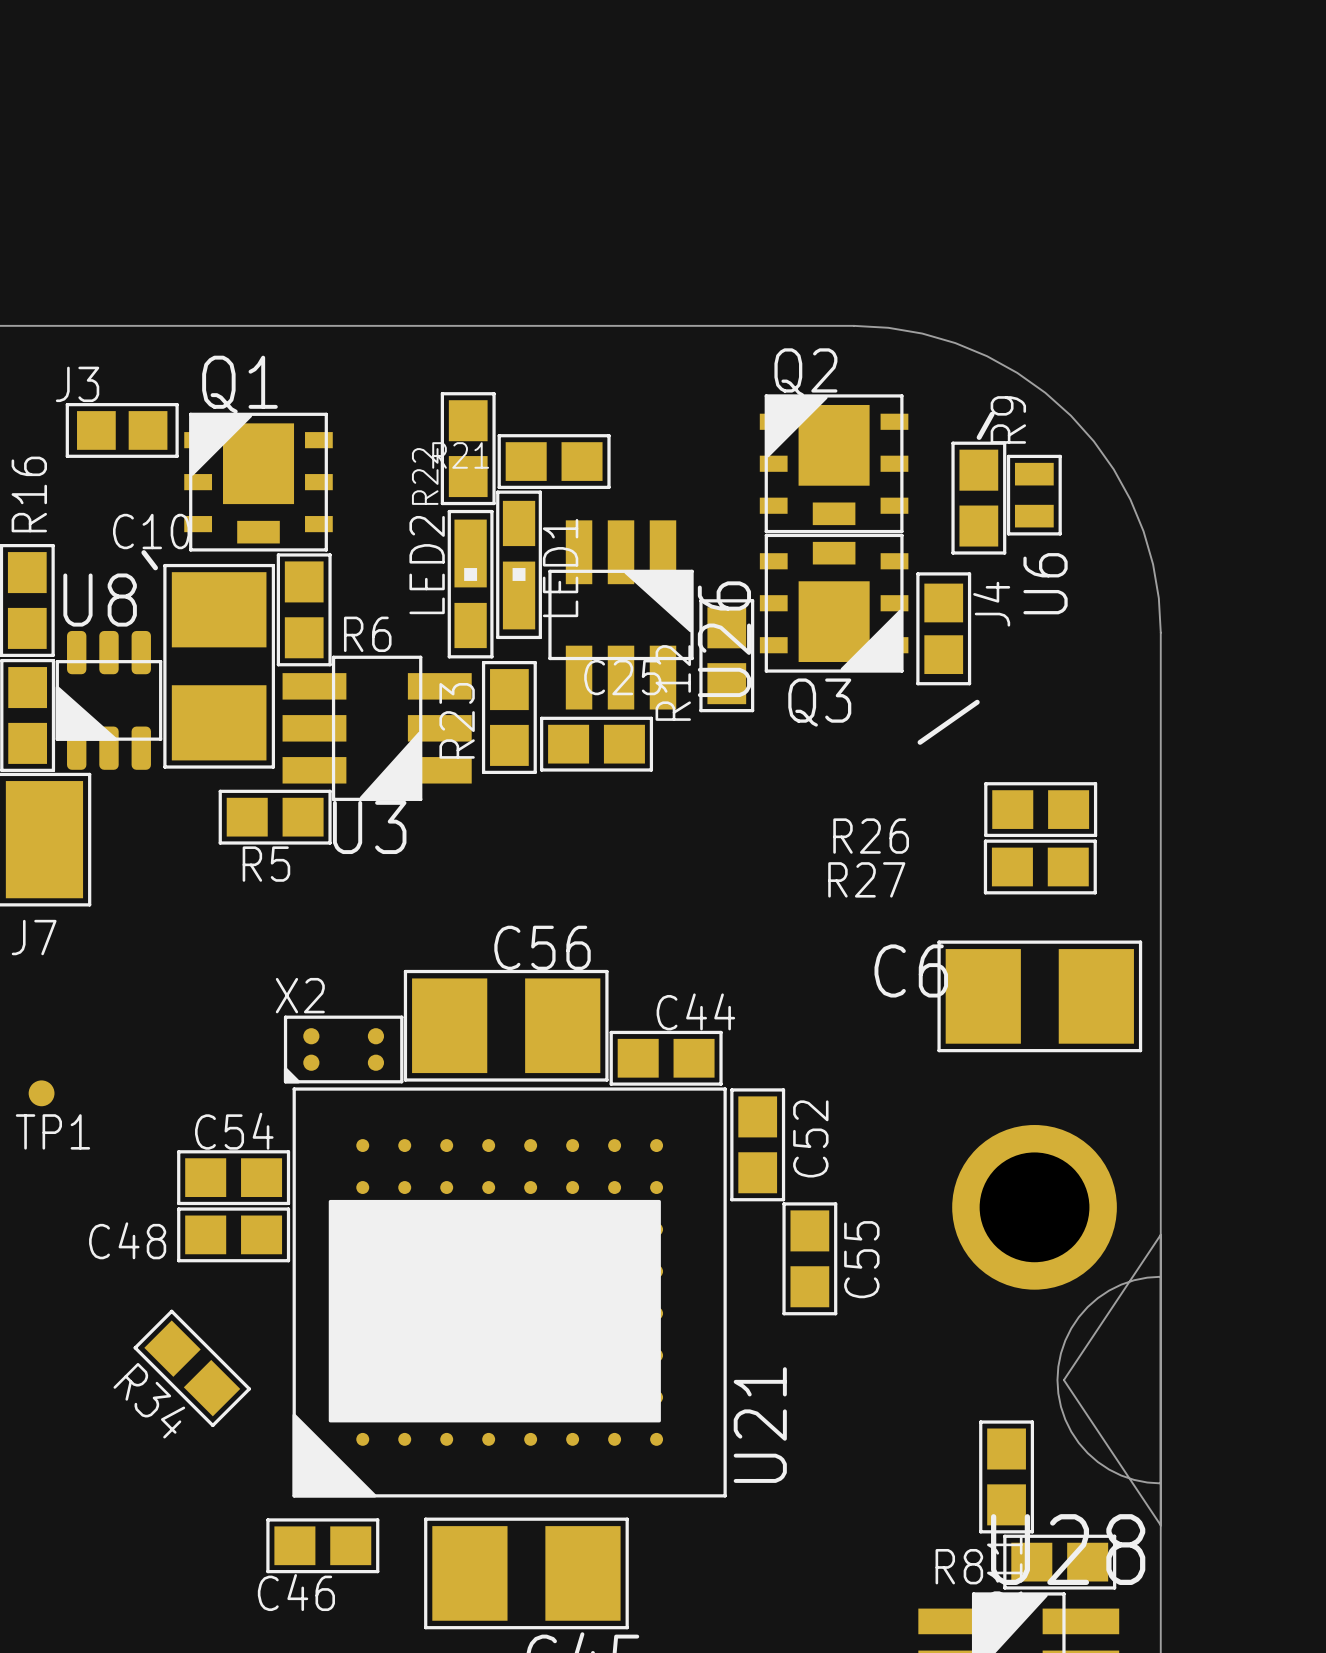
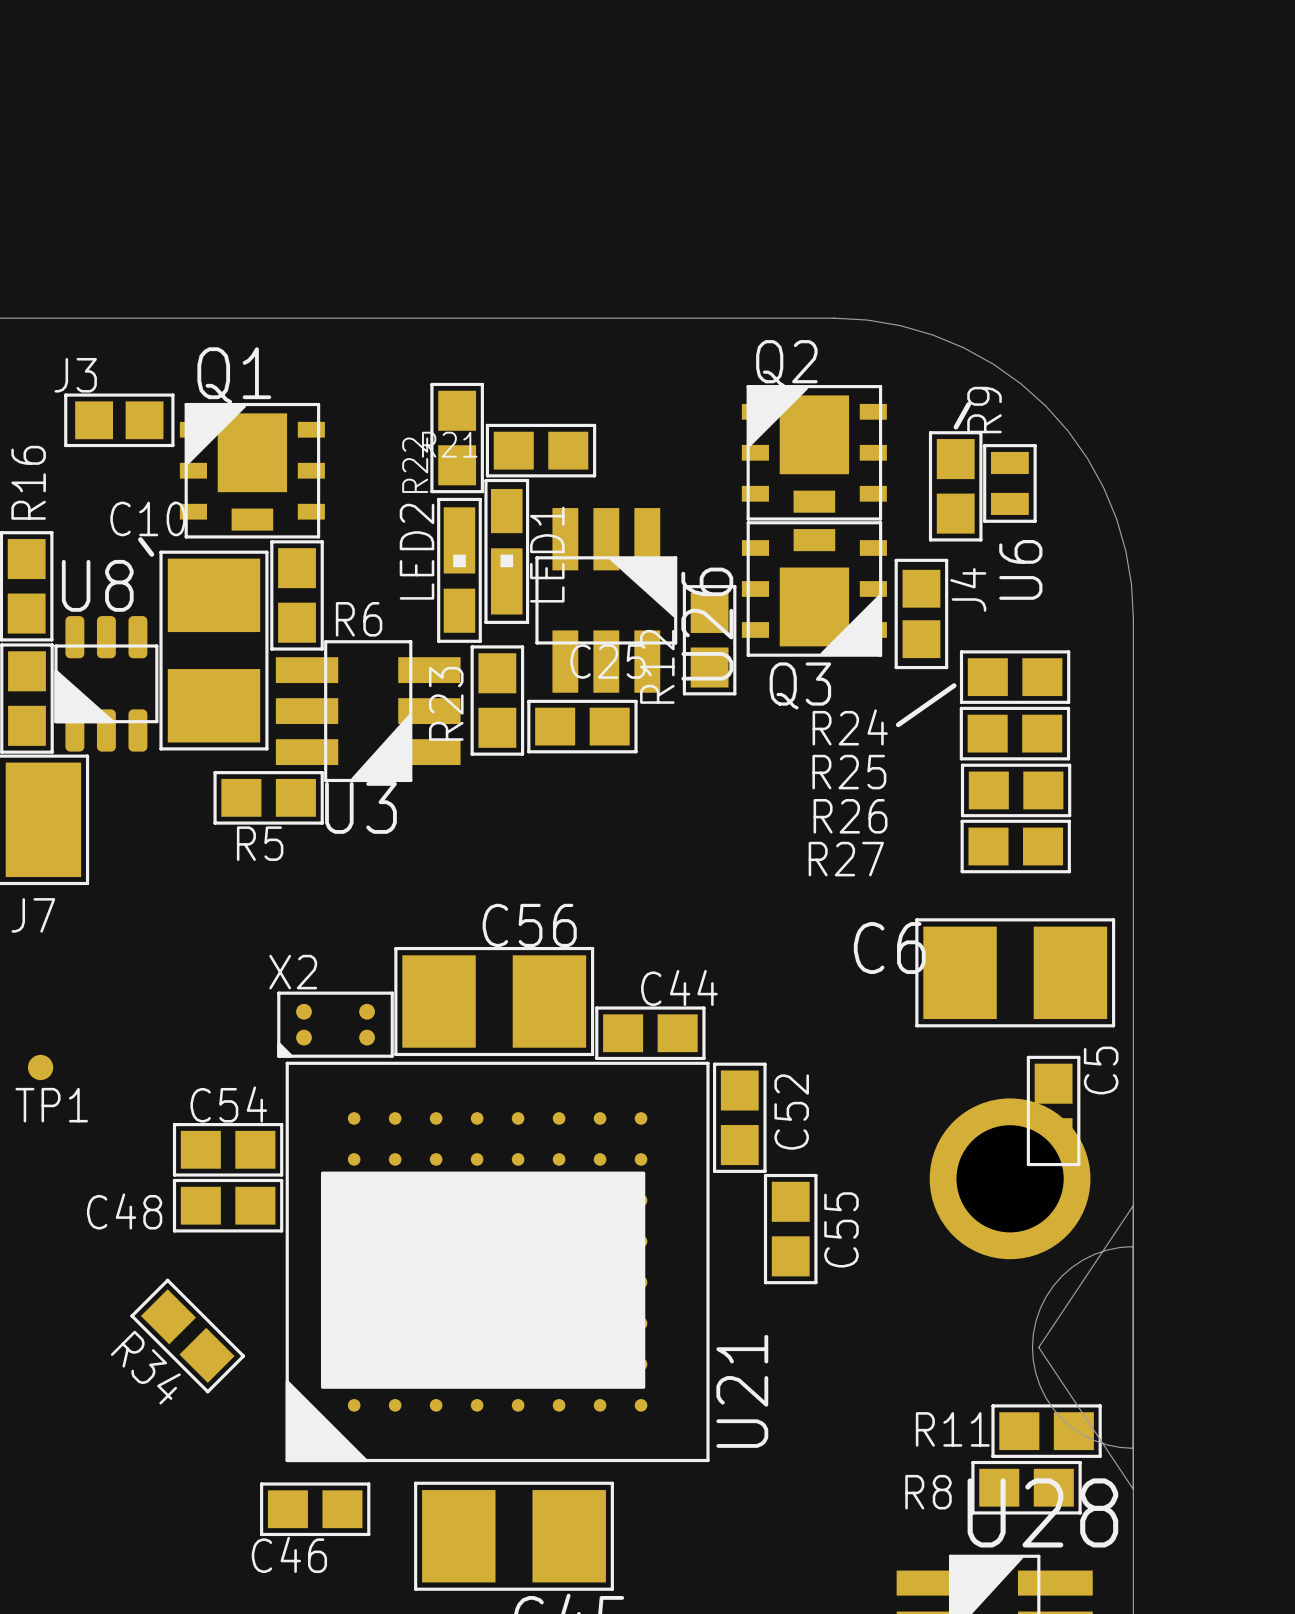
R24: none -> (1015, 677)
R25: none -> (1014, 733)
C5: none -> (1053, 1110)
R11 rotation: 0° (1006, 1476) -> 90° clockwise (1046, 1431)
R8 position: (1059, 1562) -> (1026, 1487)

